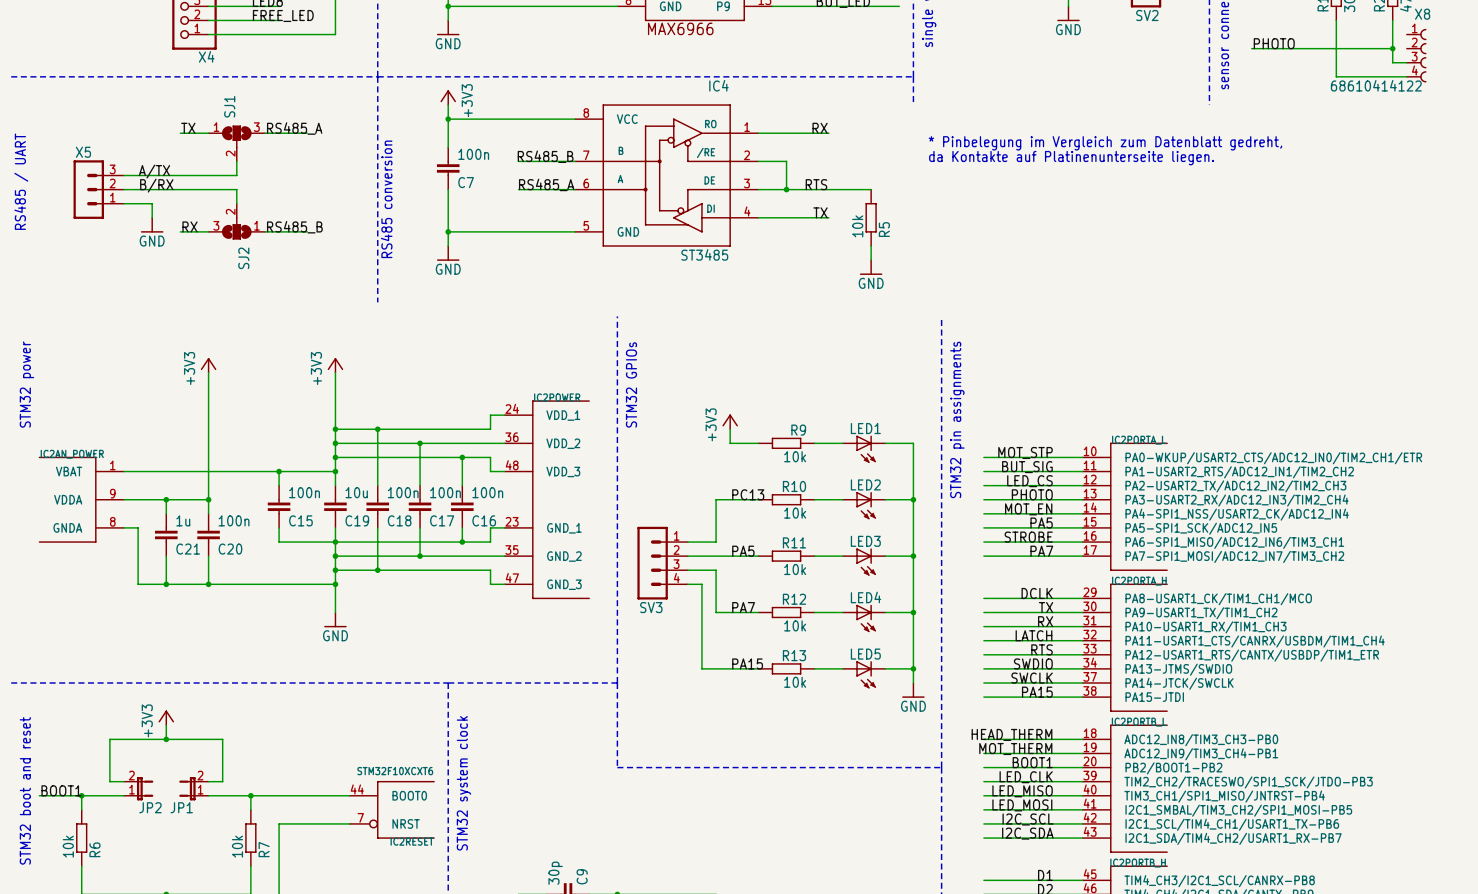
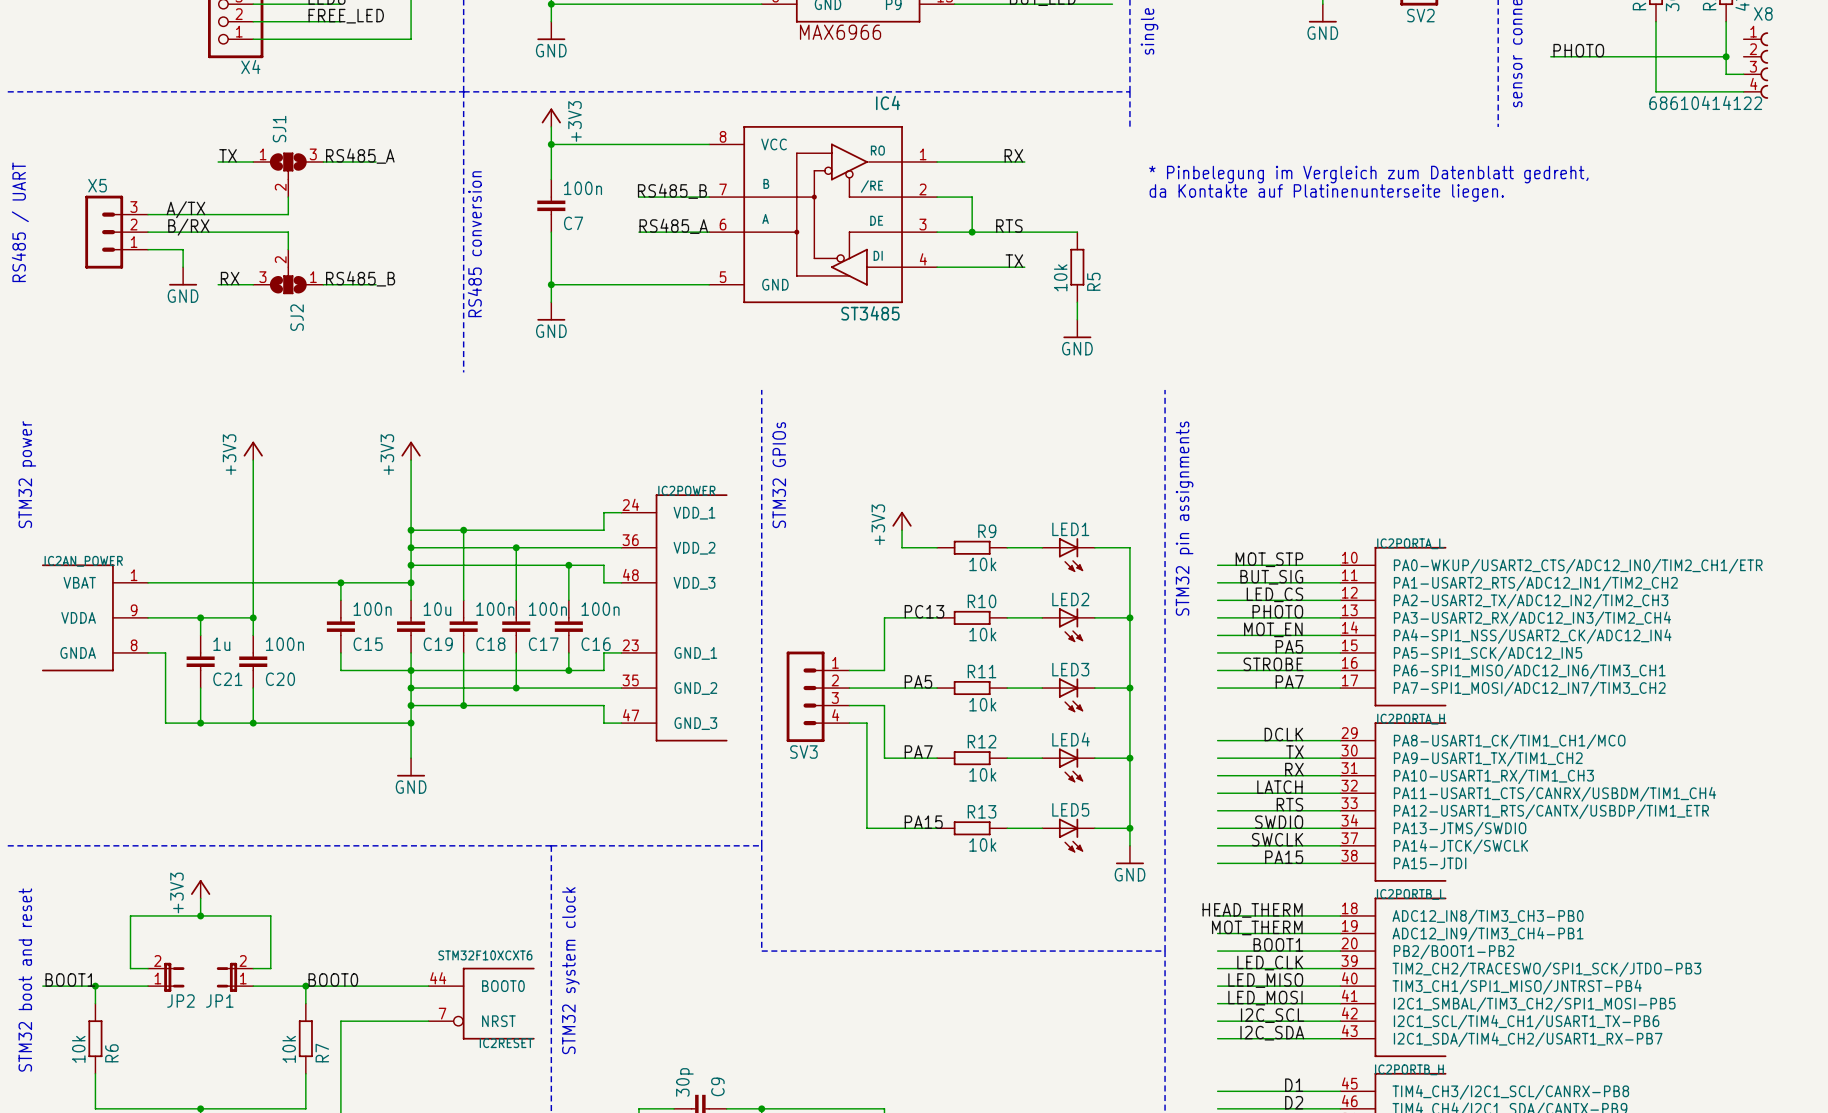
label: none -> BOOT0 (333, 979)

